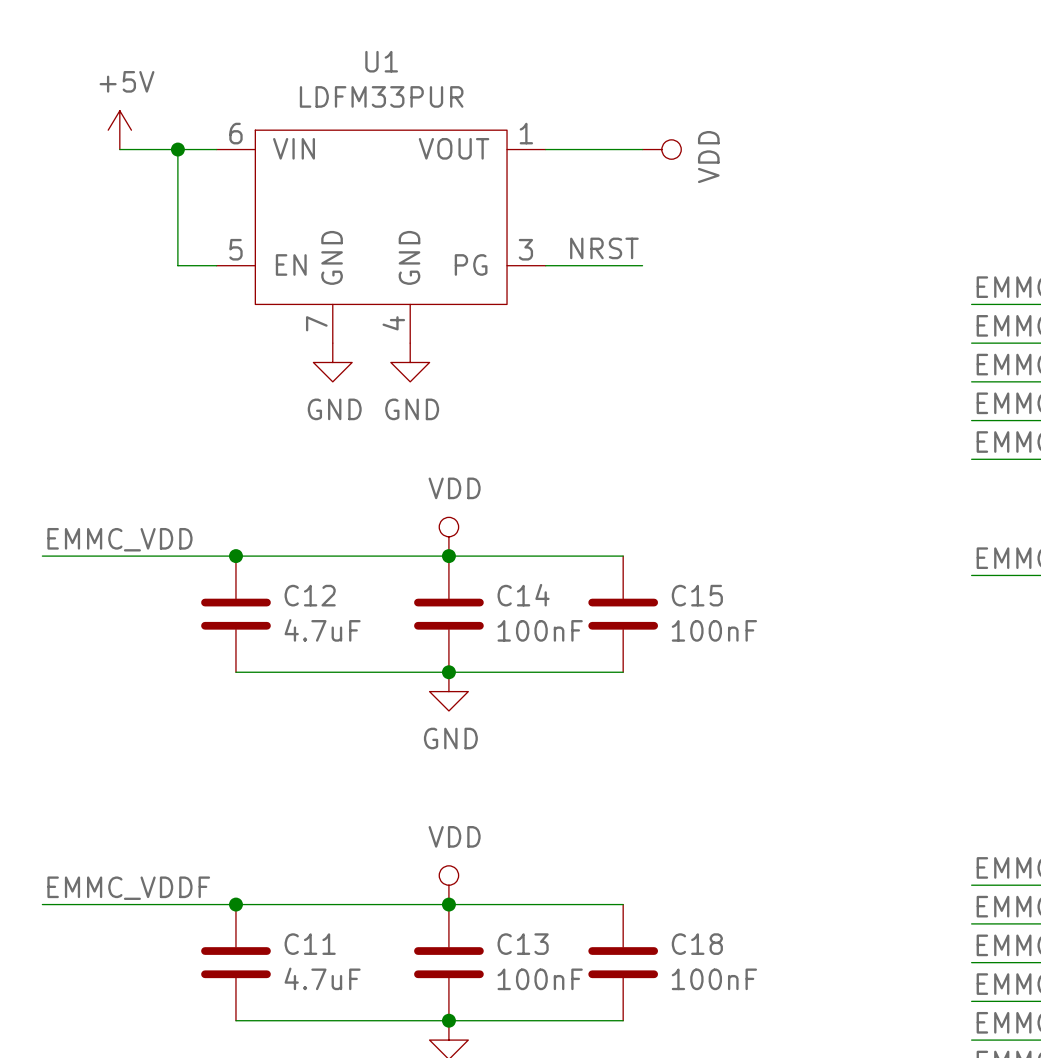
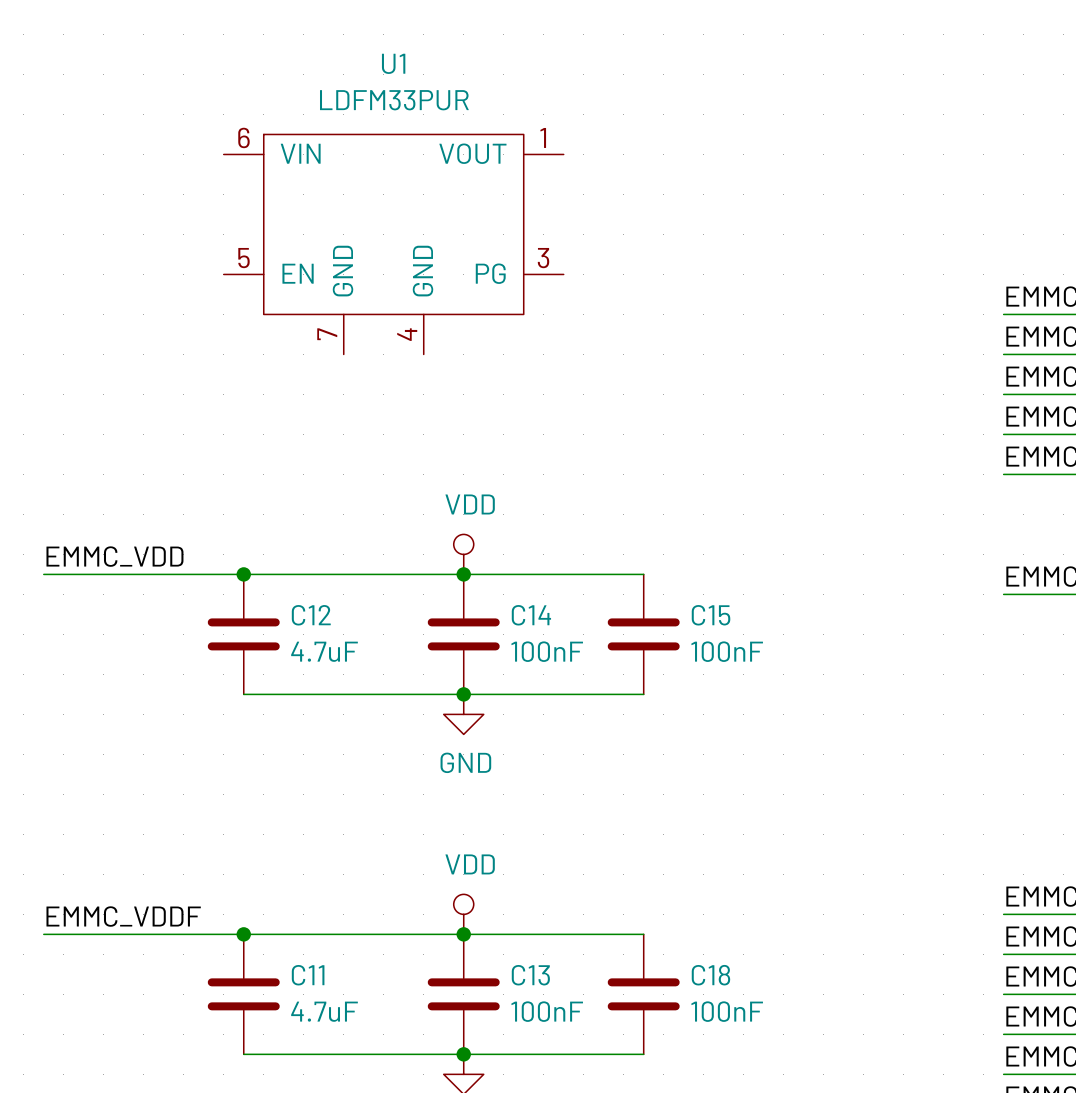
power symbol: +5V (119, 130) -> none
wire: (119, 149) (216, 149) -> none
wire: (177, 149) (177, 265) (216, 265) -> none
junction: (177, 149) -> none
wire: (545, 149) (642, 149) -> none
power symbol: VDD (661, 149) -> none
label: NRST (604, 248) -> none
wire: (545, 265) (642, 265) -> none
power symbol: GND (332, 362) -> none
power symbol: GND (410, 362) -> none

